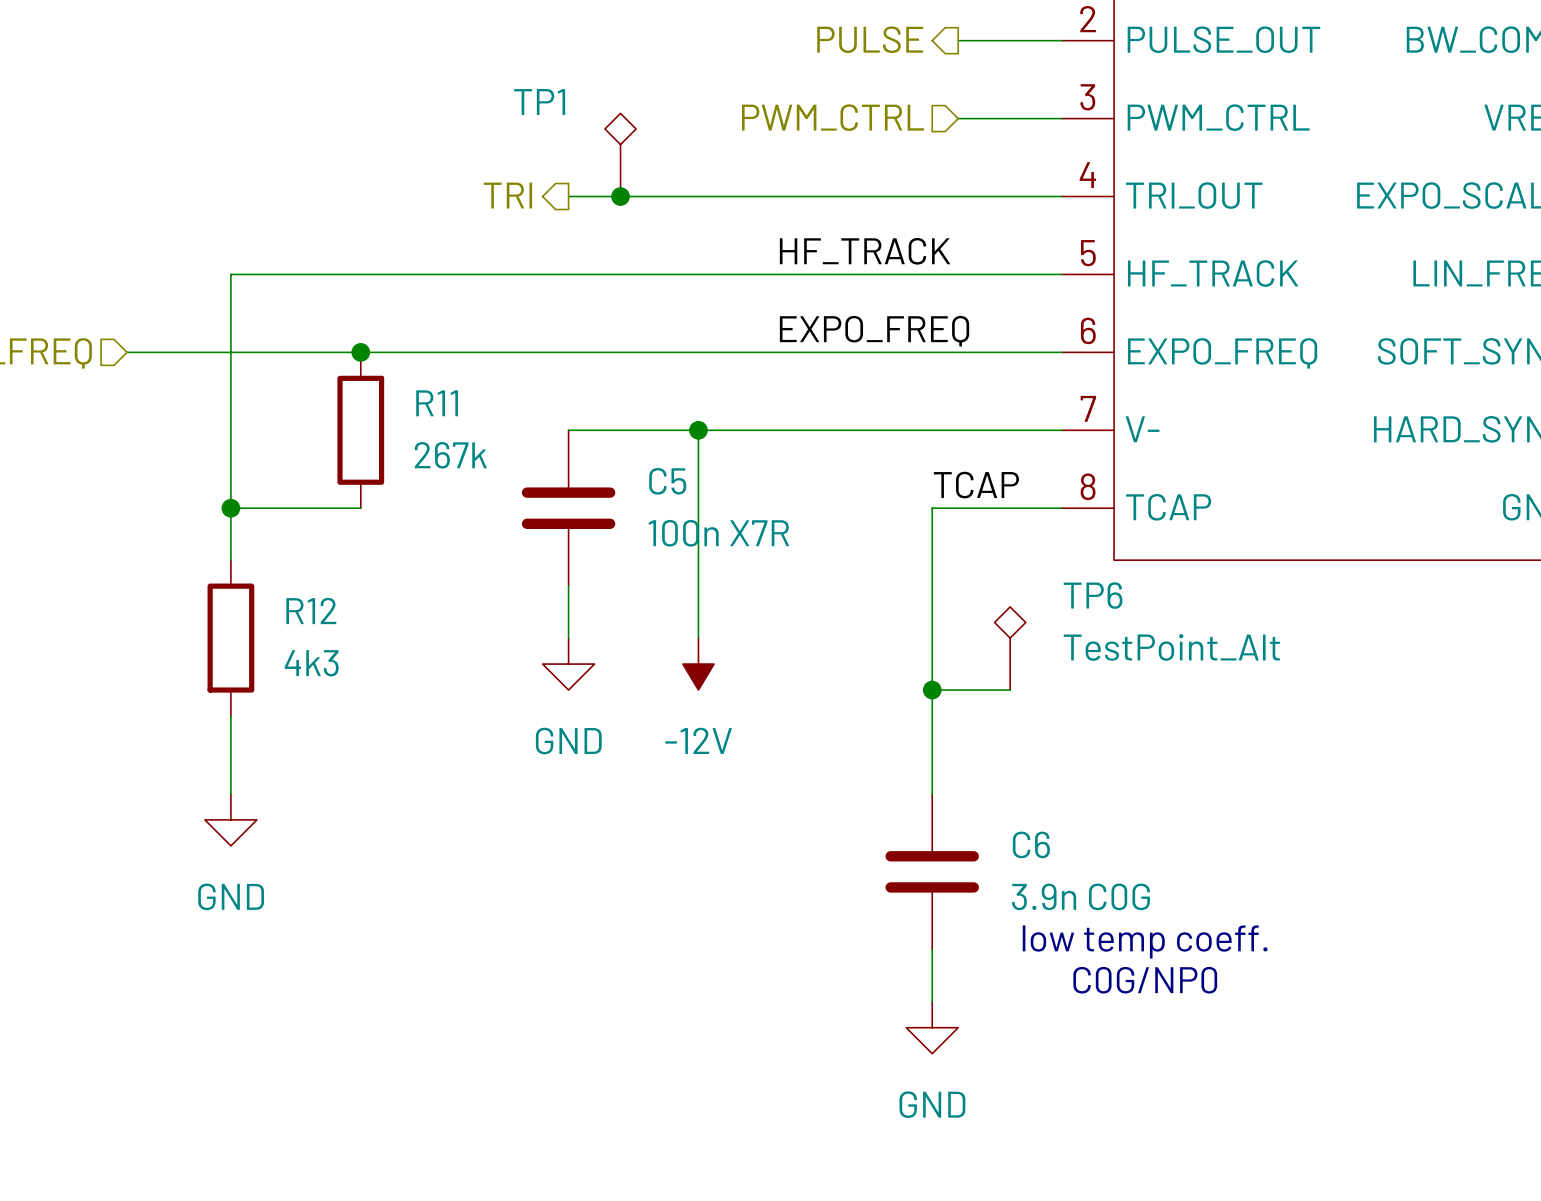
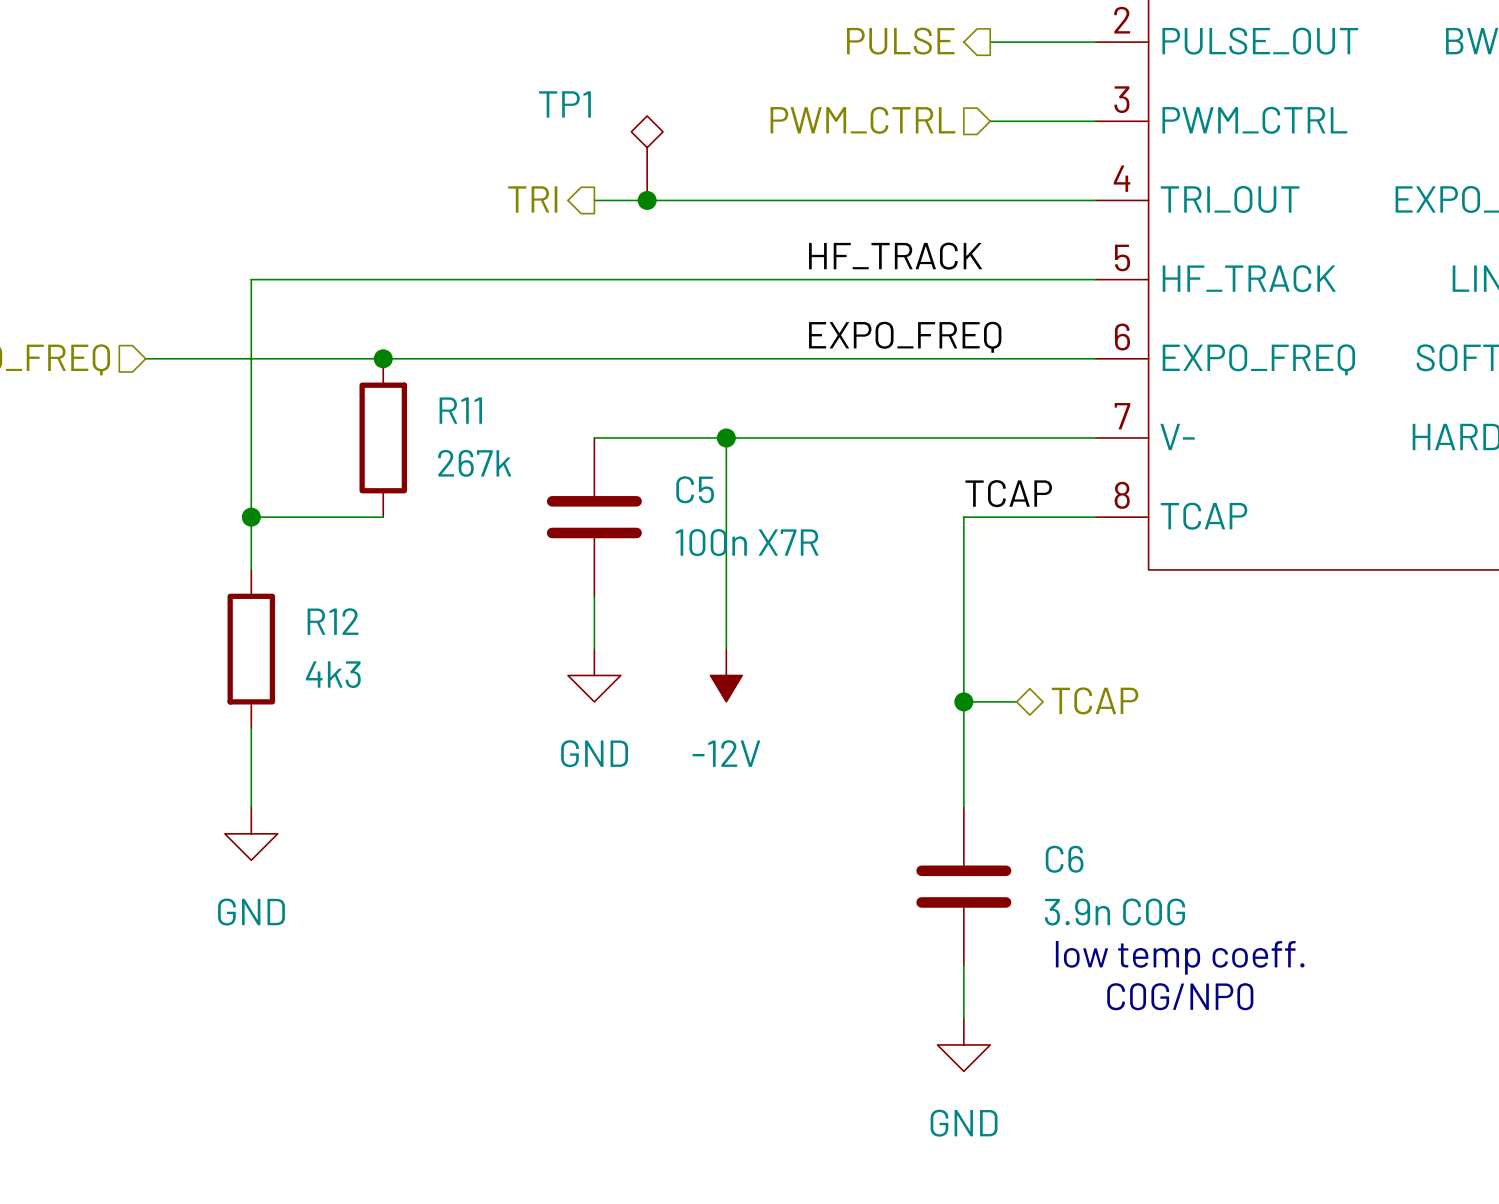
TP6: TestPoint_Alt (1010, 648) -> none
hierarchical label: none -> TCAP (1095, 700)
wire: (984, 690) (1010, 690) -> none

